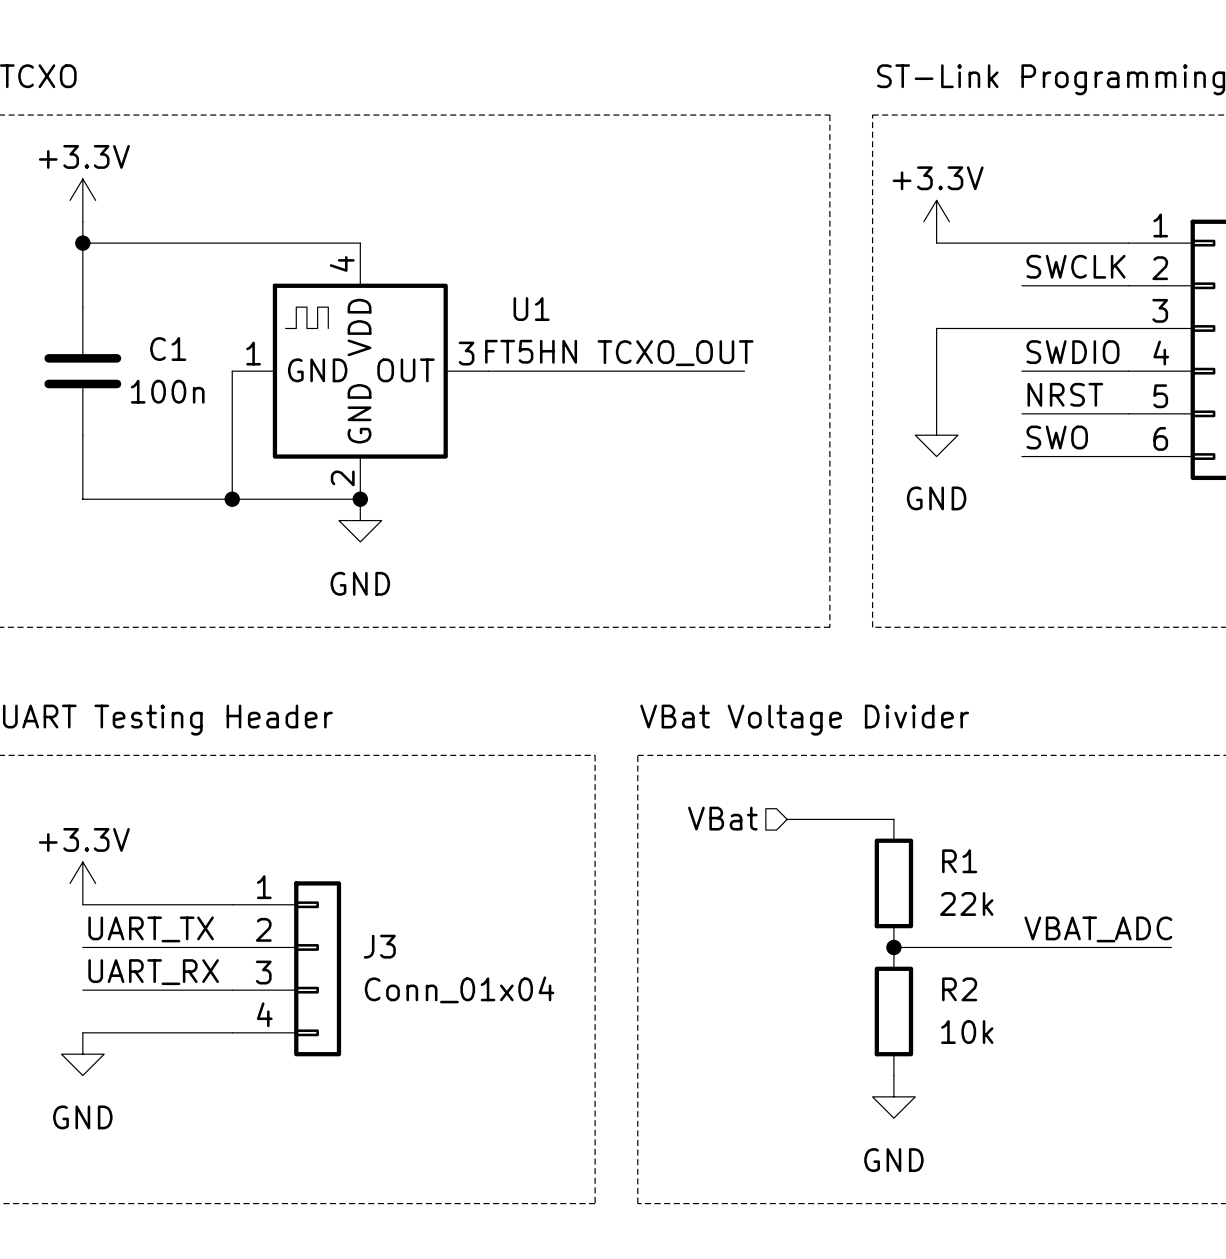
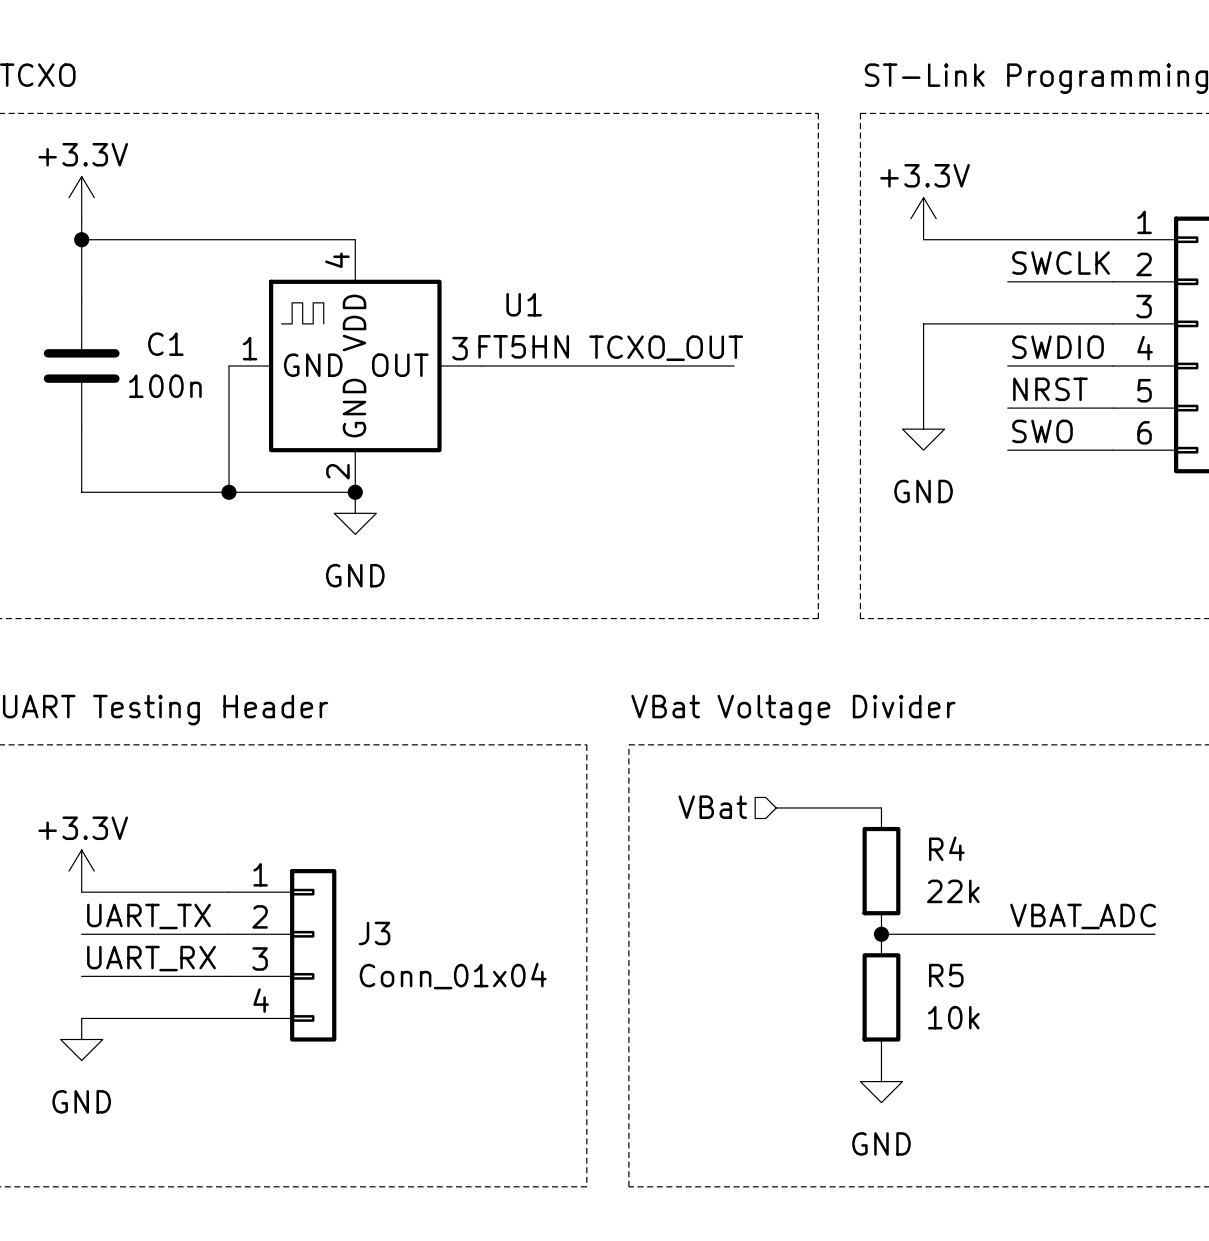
R1 name: R1 (959, 861) -> R4 (946, 848)
R2 name: R2 (959, 989) -> R5 (946, 975)

